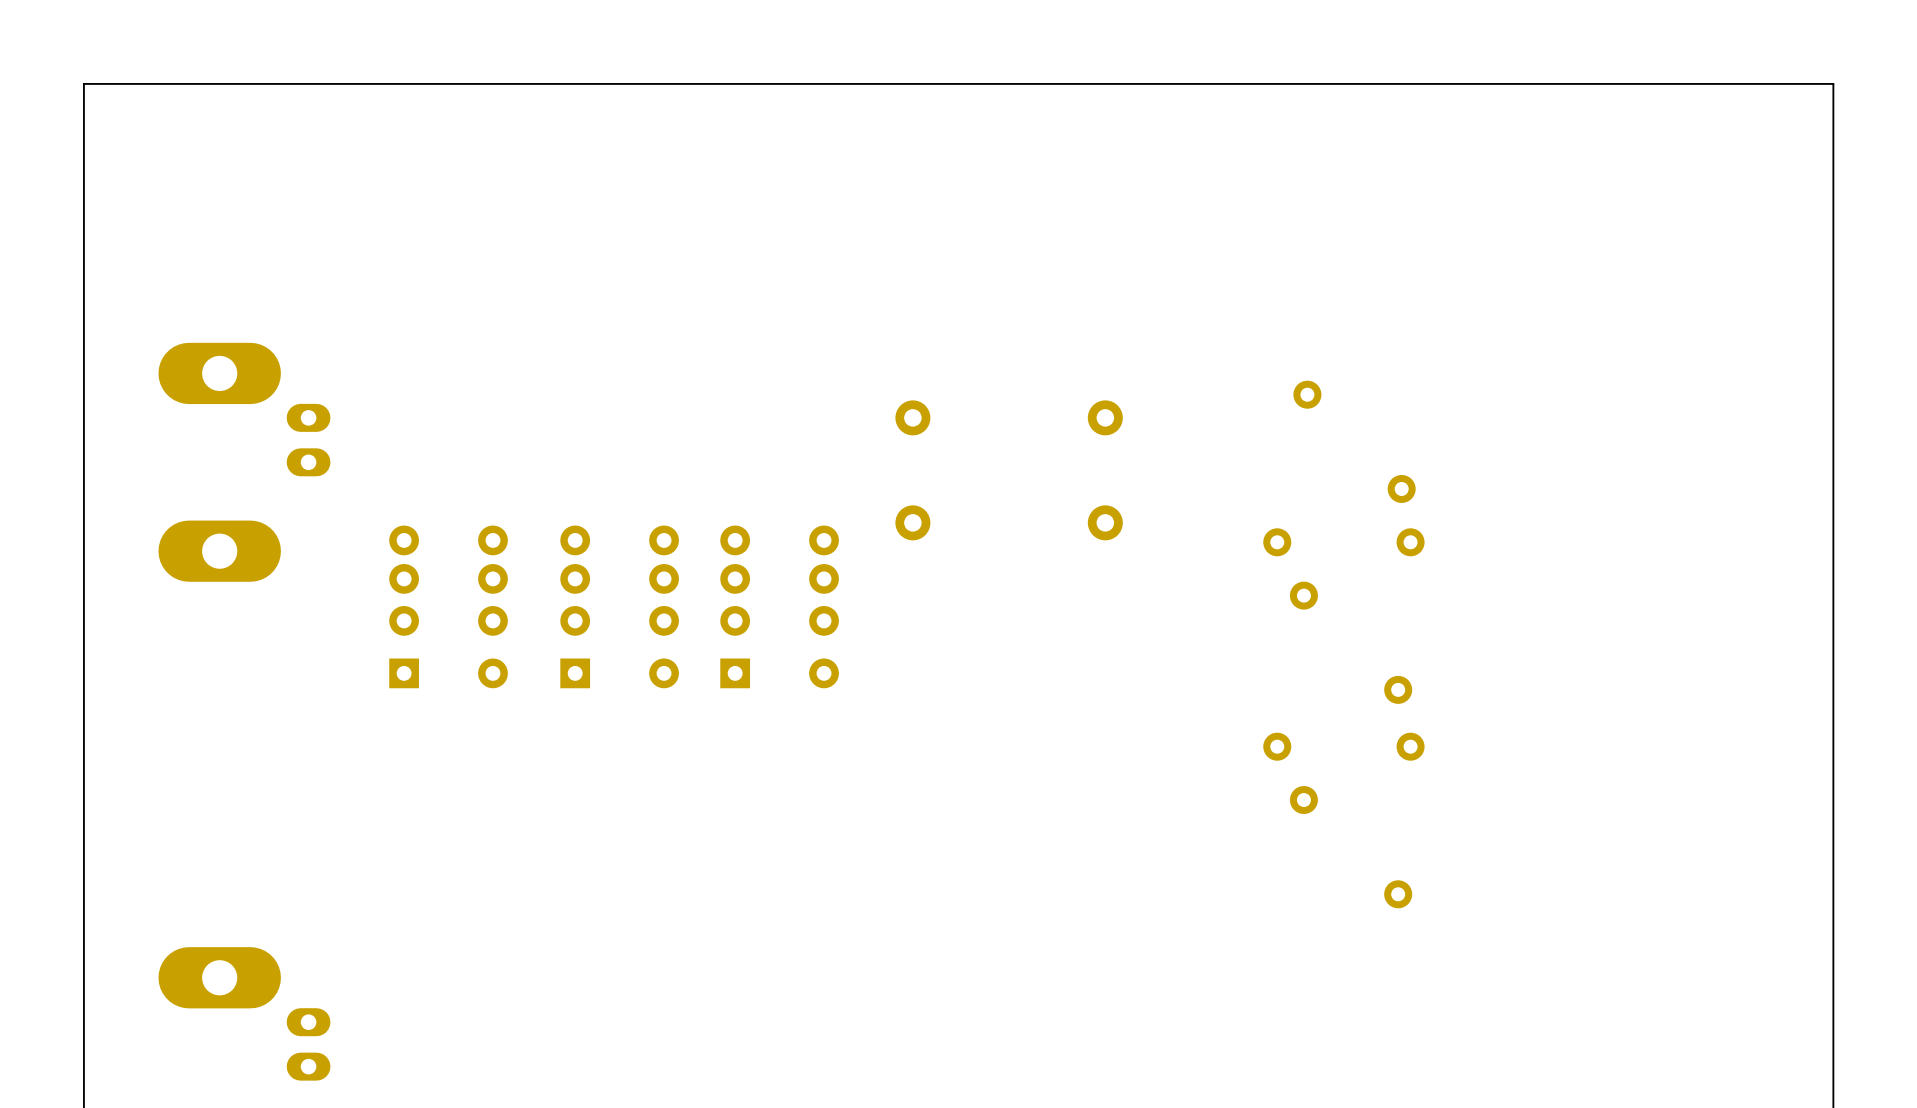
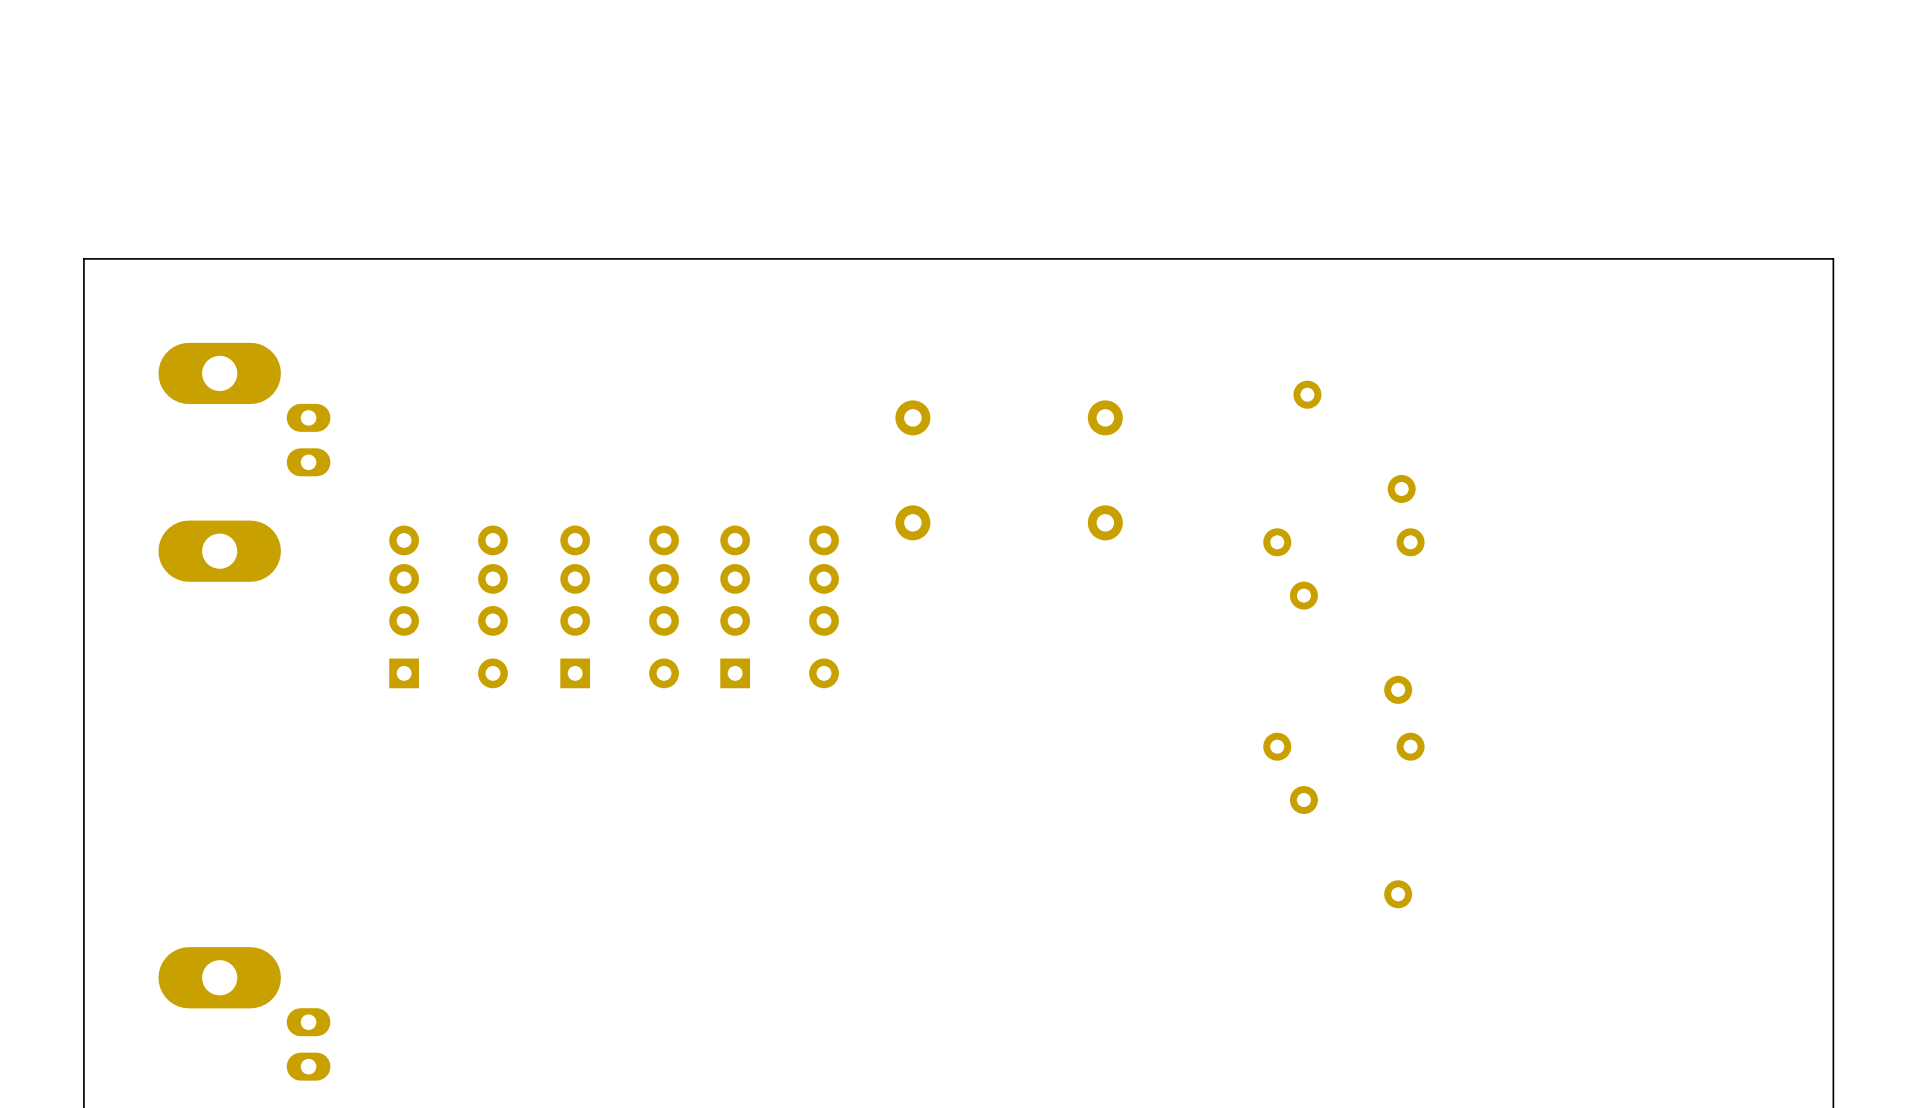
board edge: (1833, 258) (1833, 83) (83, 83) (83, 258) -> (1833, 258) (83, 258)

